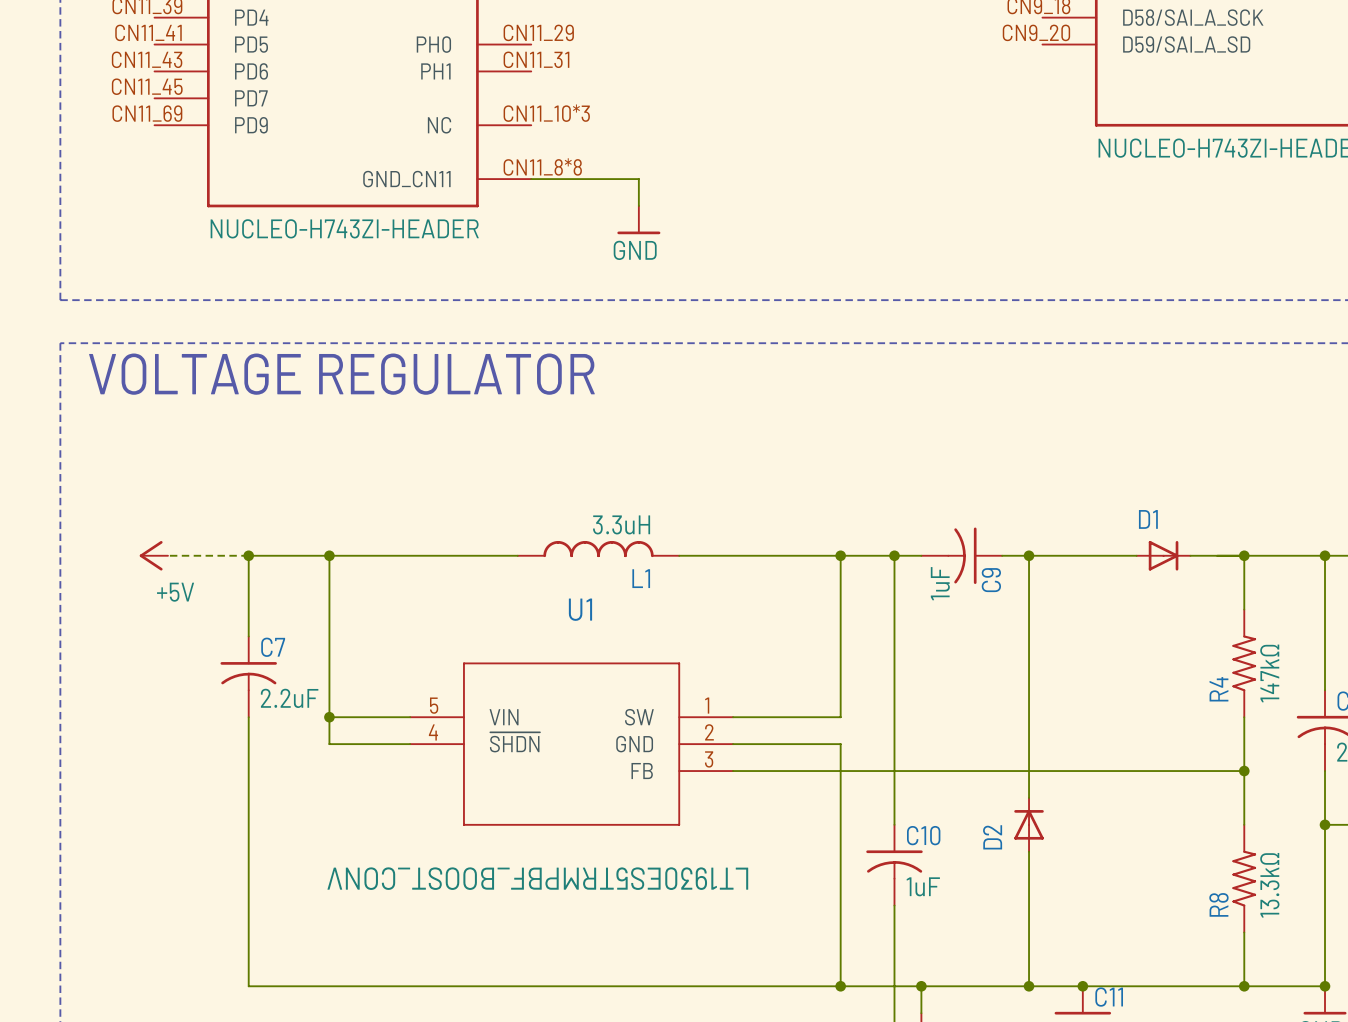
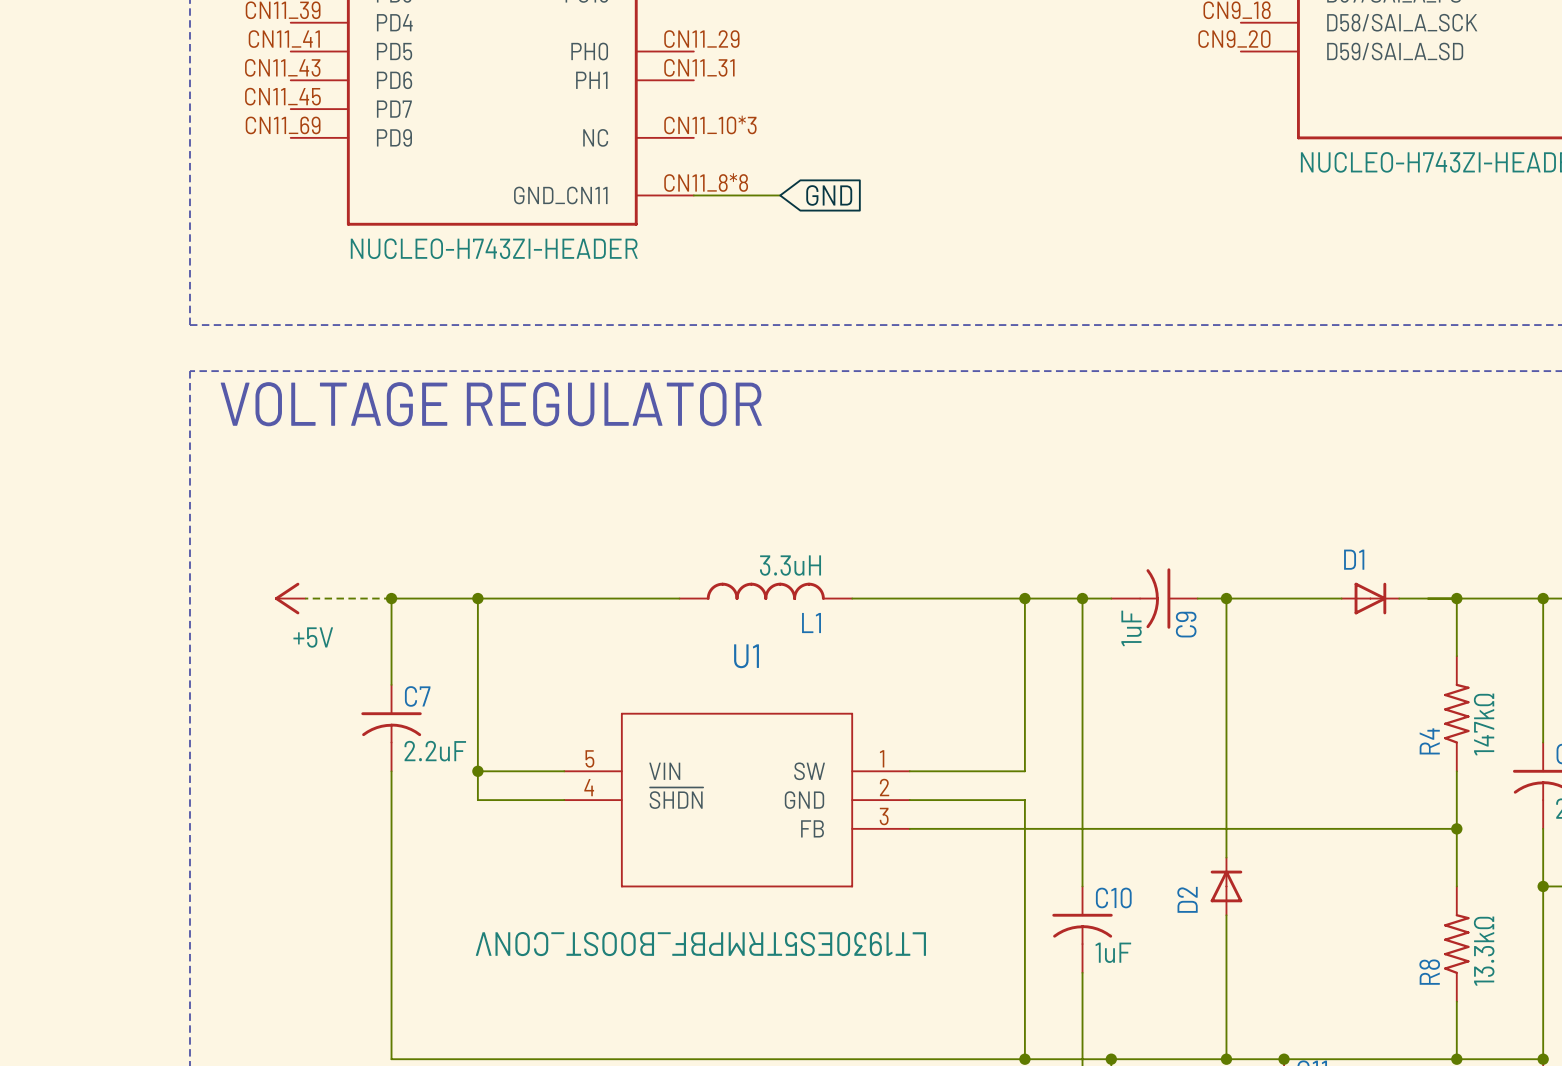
wire: (611, 179) (638, 179) (638, 205) -> none
global label: none -> GND (829, 195)
power symbol: GND (638, 220) -> none

